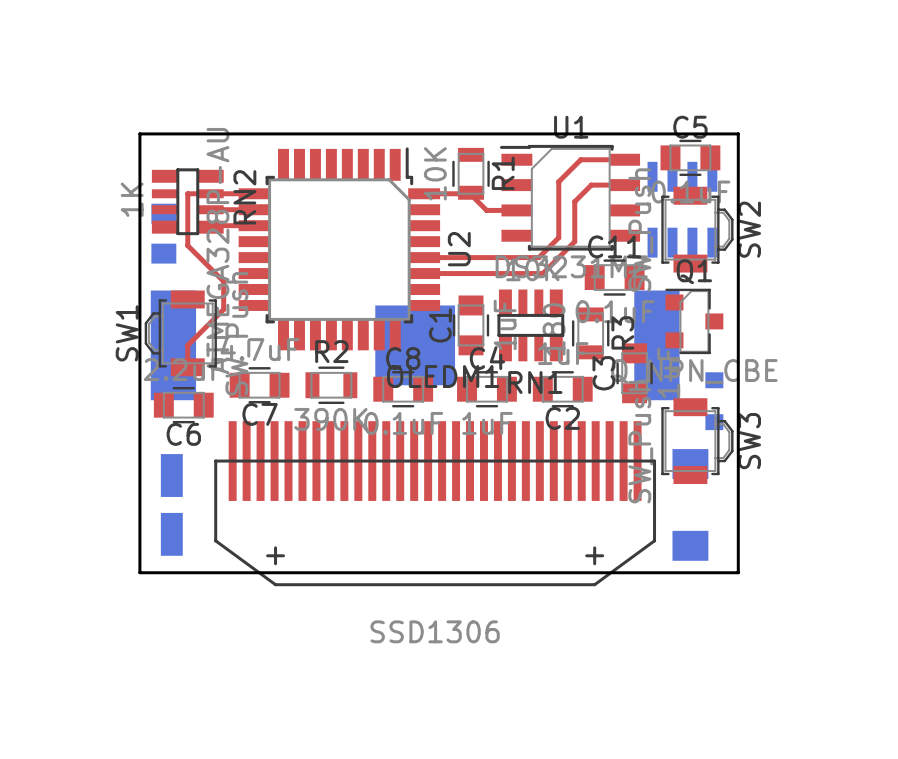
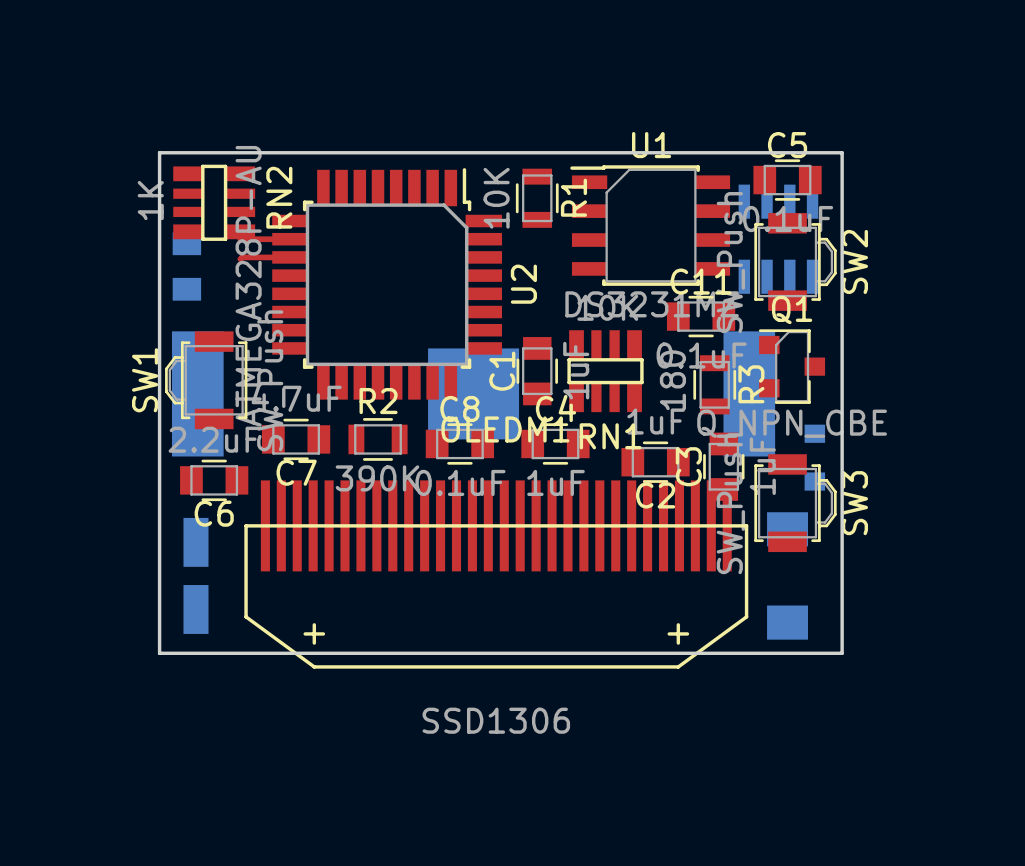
top track: (624, 159) (580, 159) (558, 181) (558, 237) (538, 257) (424, 257) -> none
top track: (624, 185) (591, 185) (574, 201) (574, 241) (542, 273) (424, 273) -> none
top track: (254, 193) (187, 193) (187, 245) (223, 281) (223, 309) (187, 345) (187, 367) -> none
top track: (424, 193) (470, 193) (486, 210) (516, 210) -> none
RN2 position: (187, 201) -> (214, 202)
R3 position: (590, 333) -> (714, 384)
C3 position: (634, 373) -> (723, 466)
C2 position: (562, 389) -> (655, 462)
C6 position: (183, 405) -> (214, 480)

